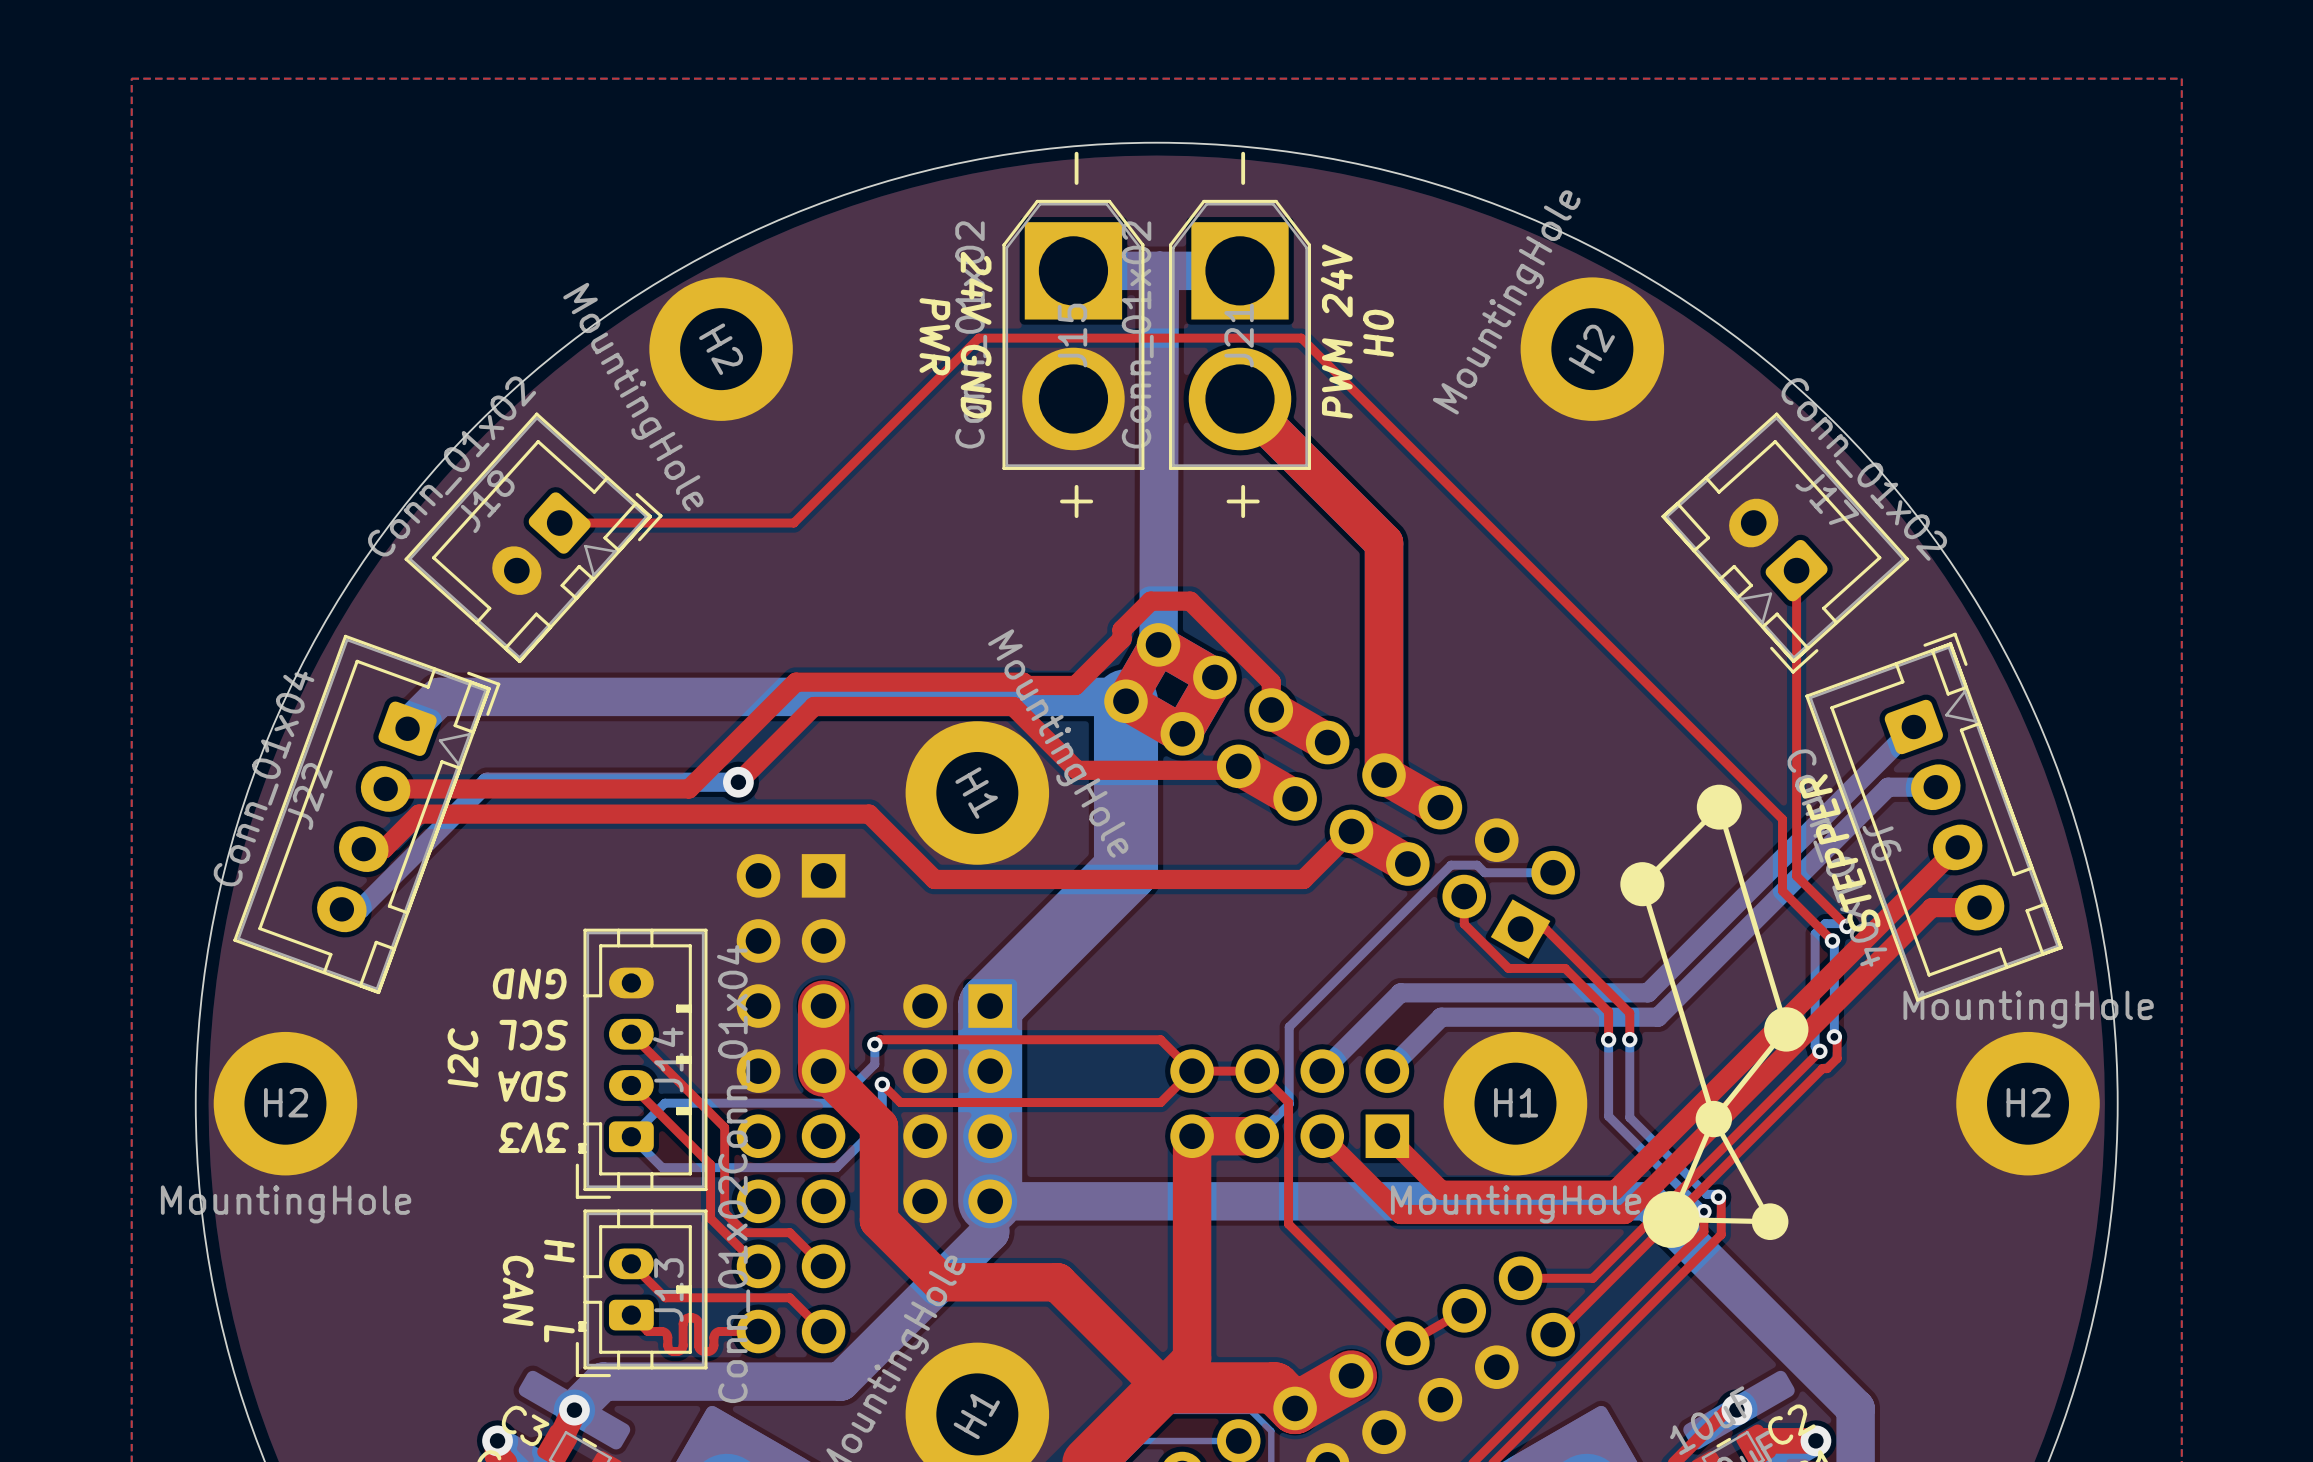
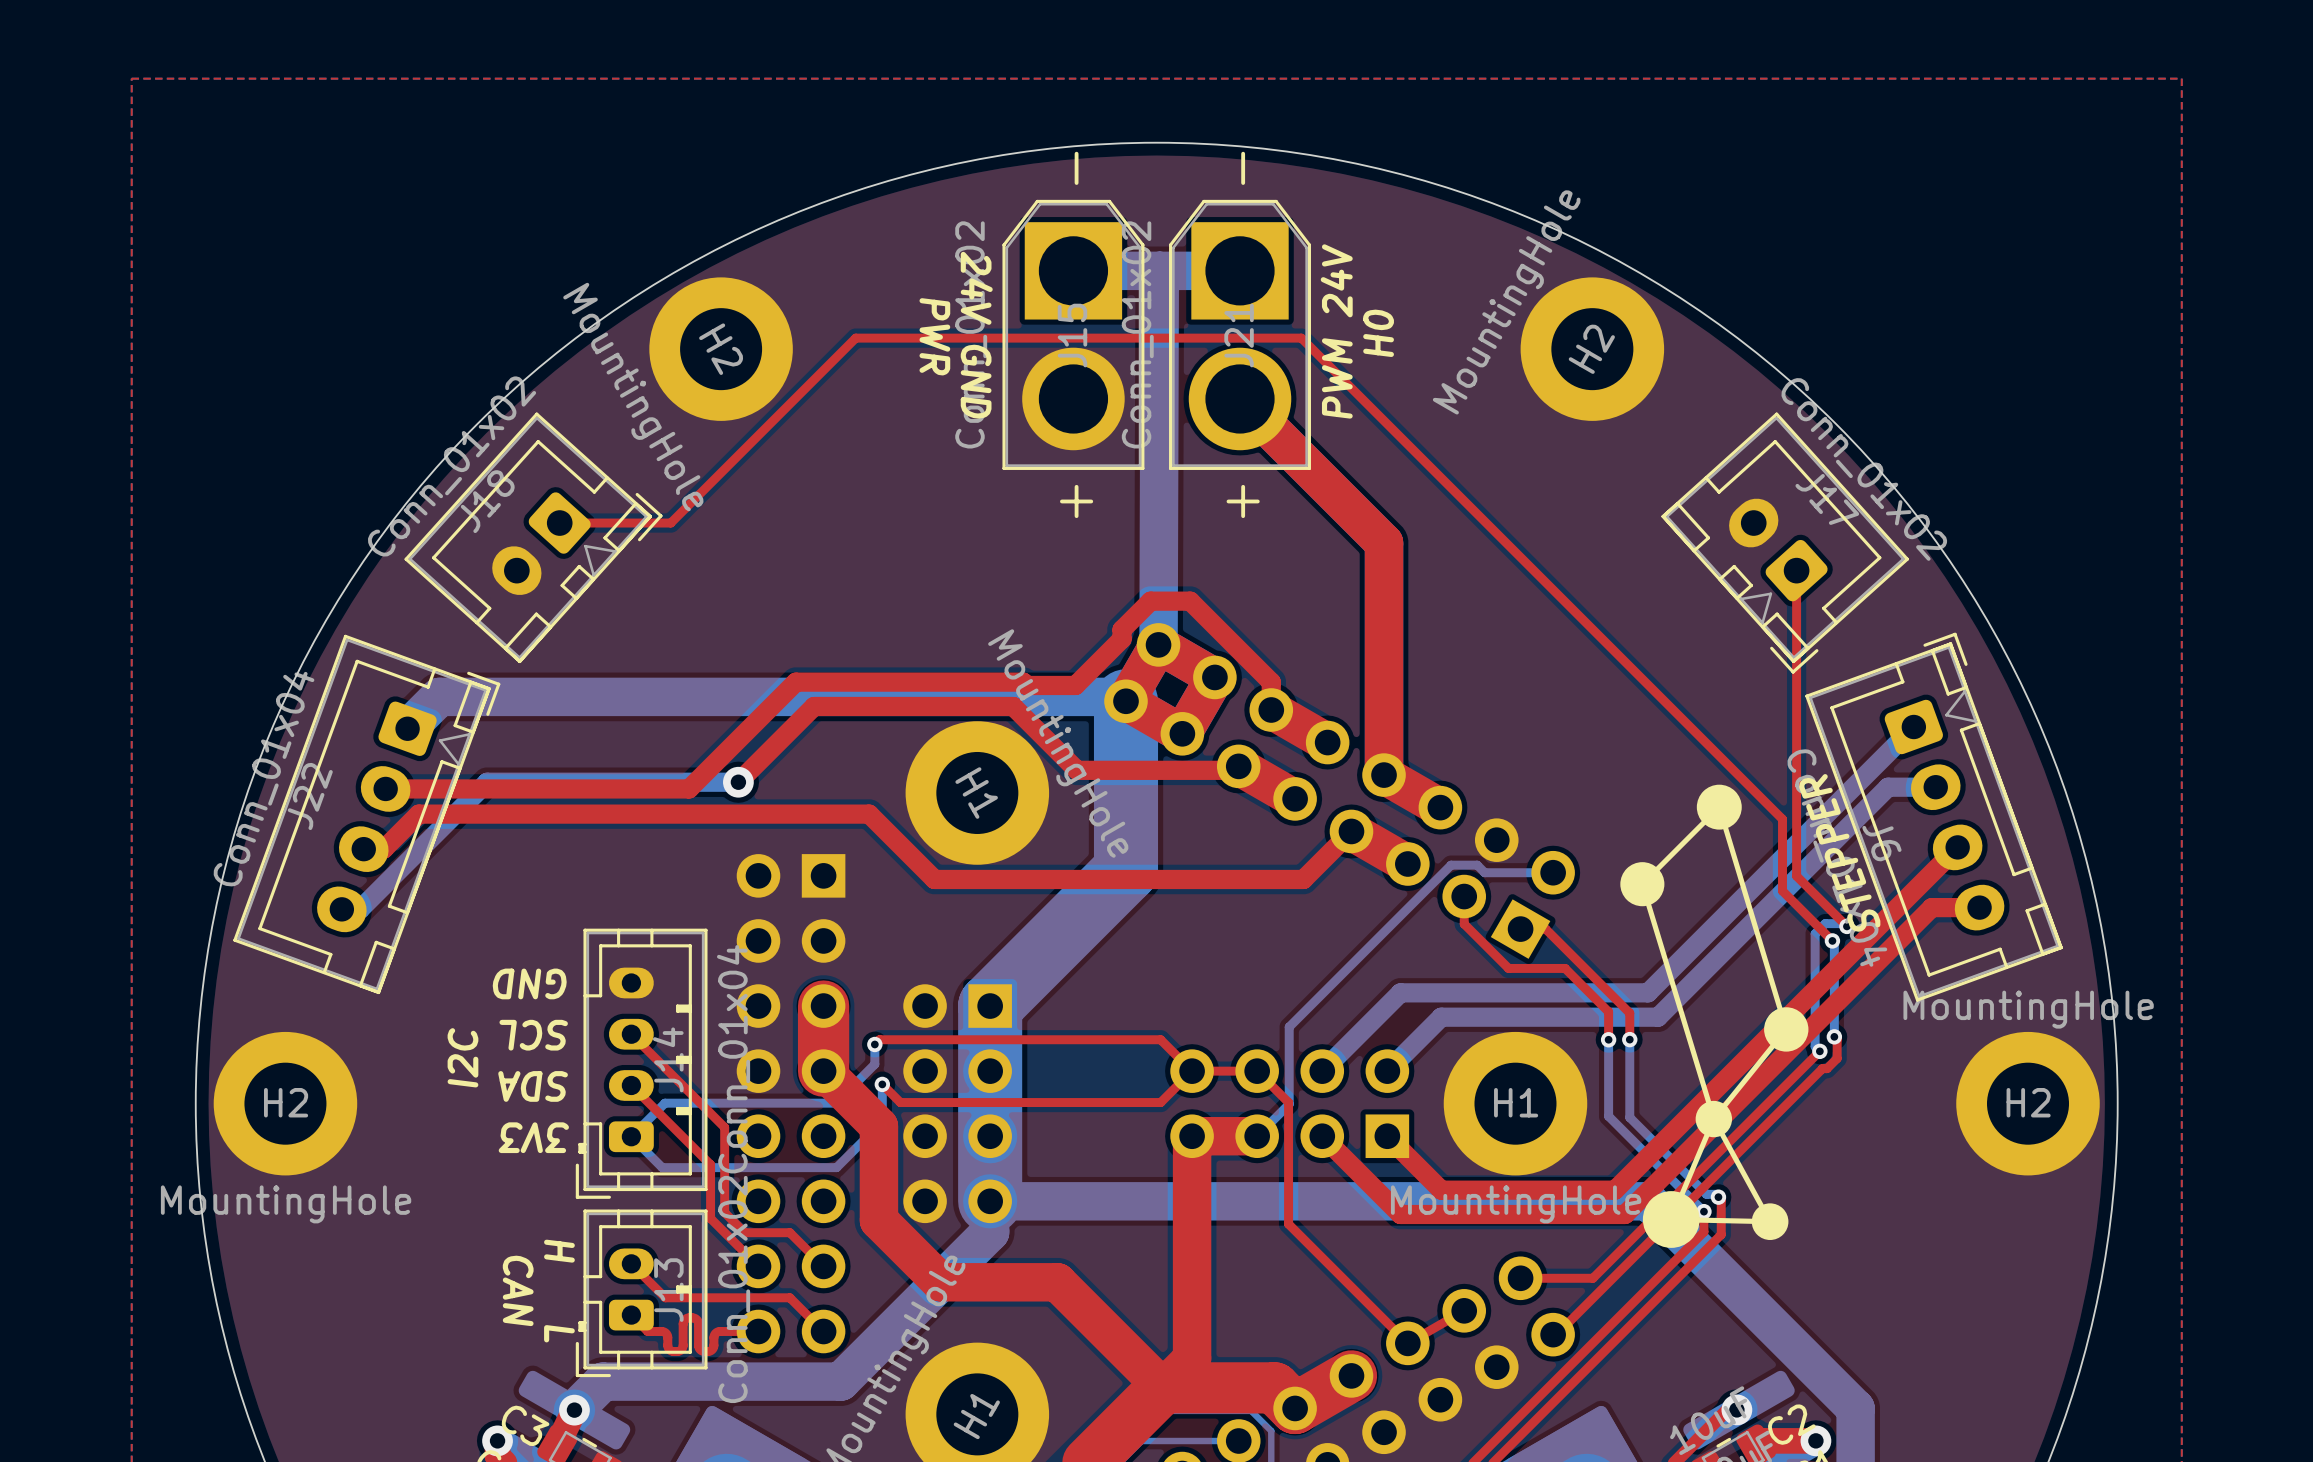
top track: (978, 338) (793, 523) (670, 523) -> (978, 338) (855, 338) (670, 523)

